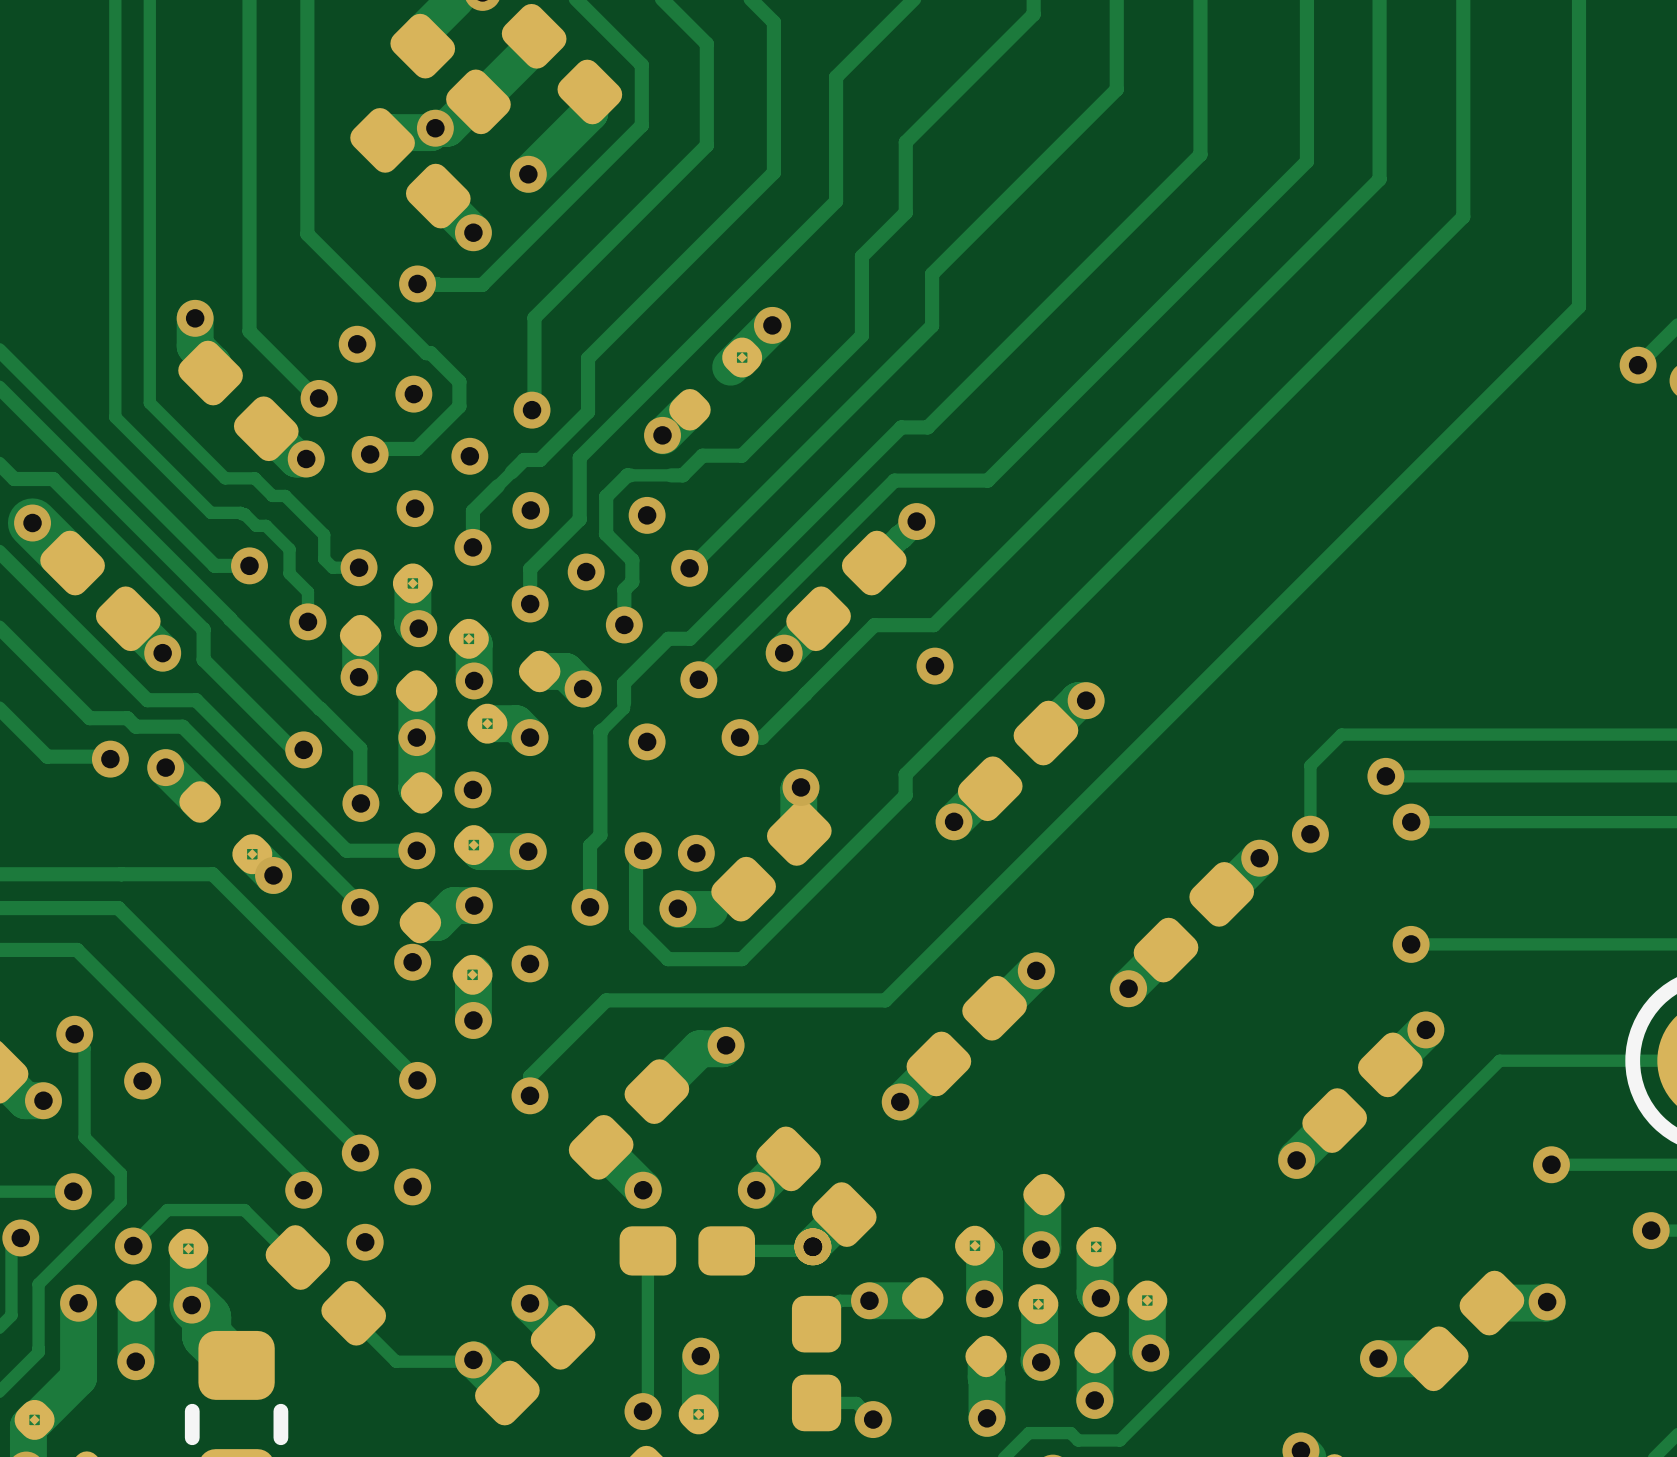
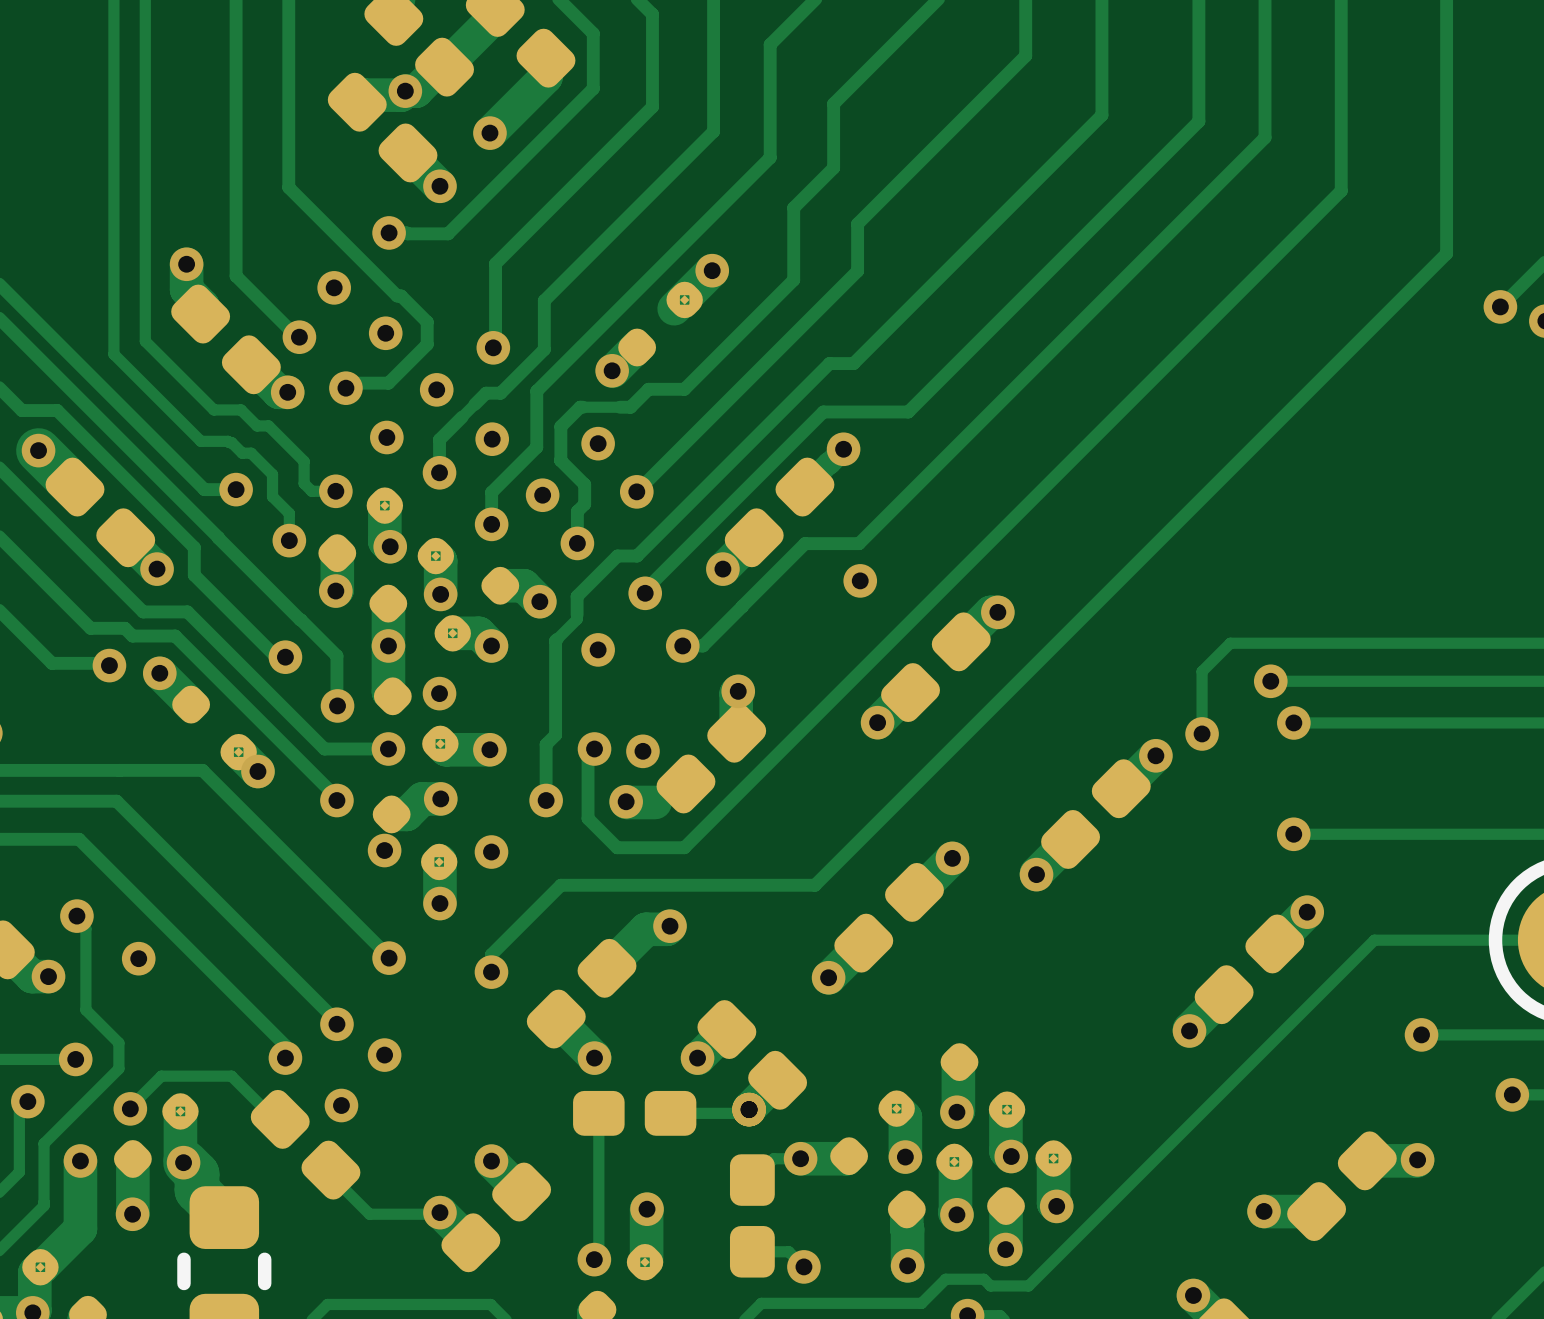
track: (1463, 216) (905, 774) (905, 795) -> (1341, 171) (1341, 190) (833, 698)

